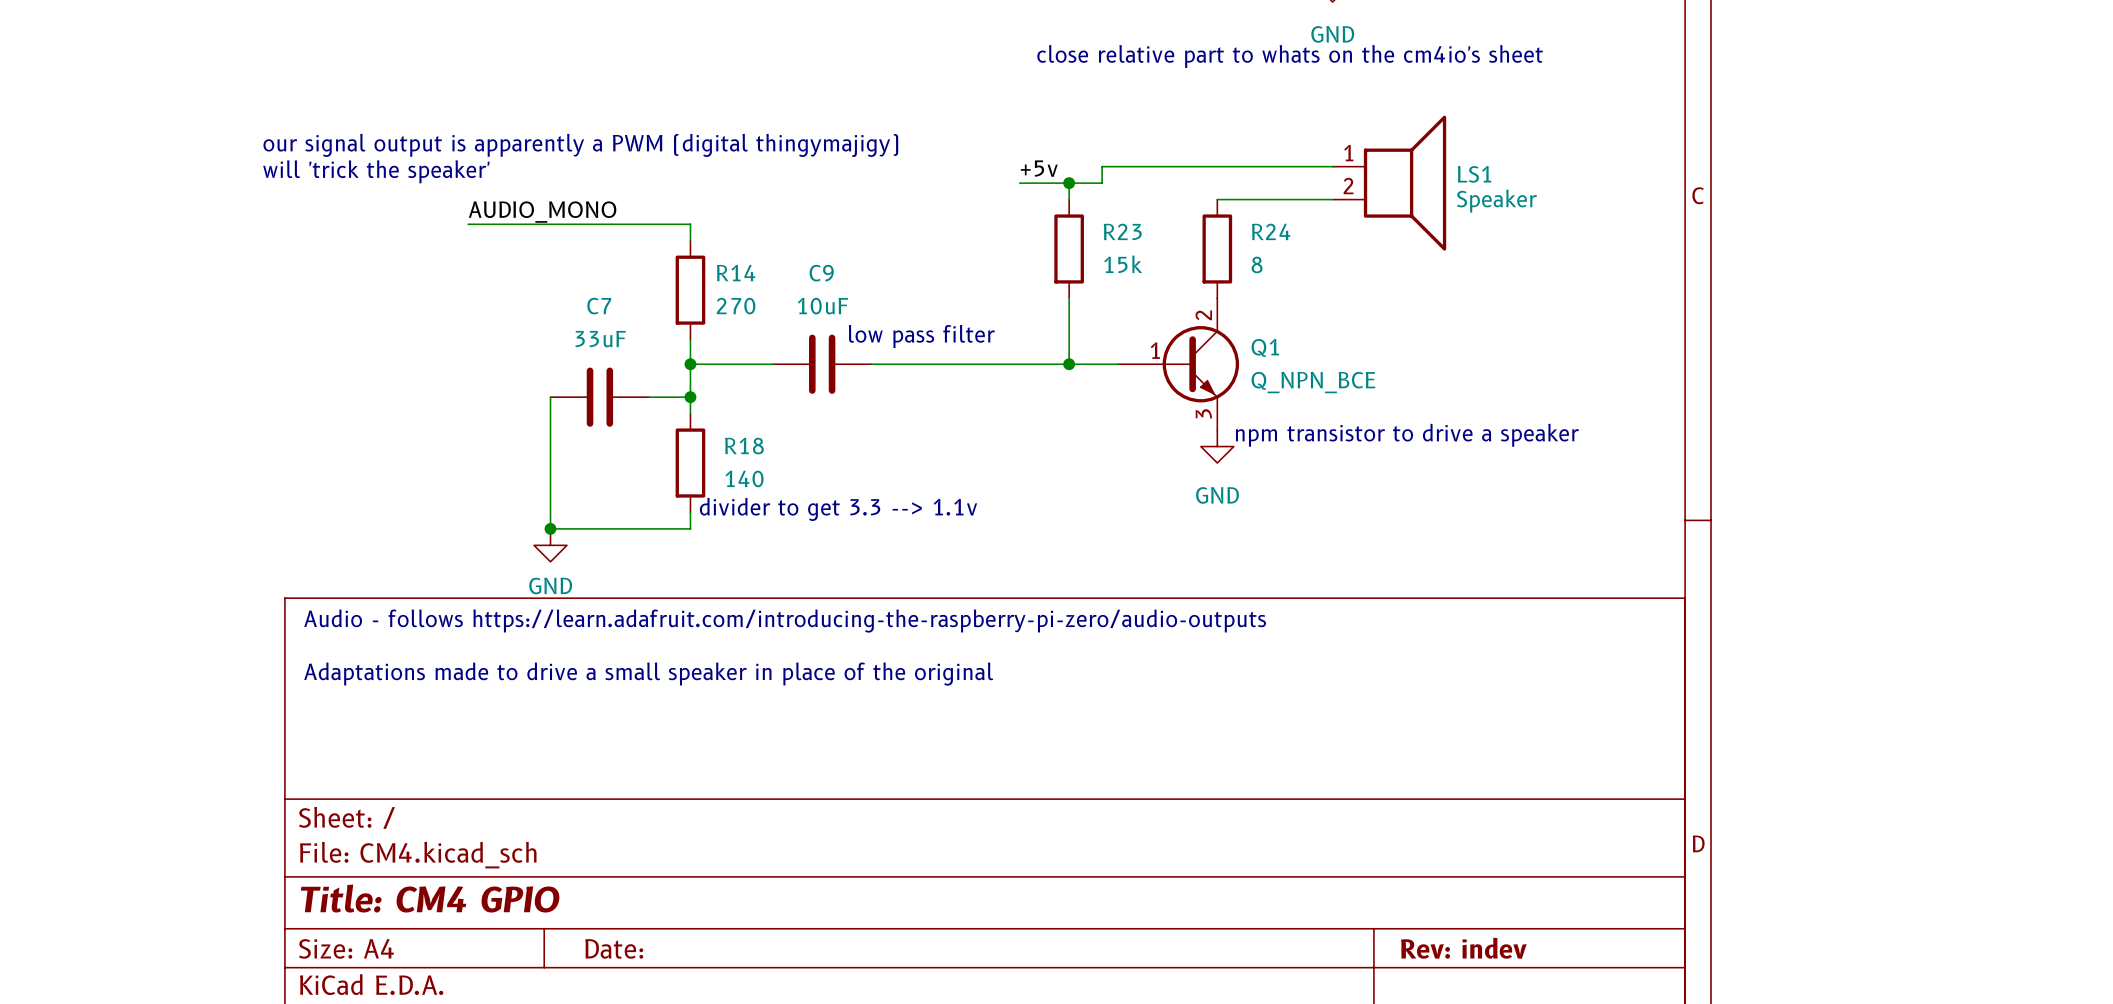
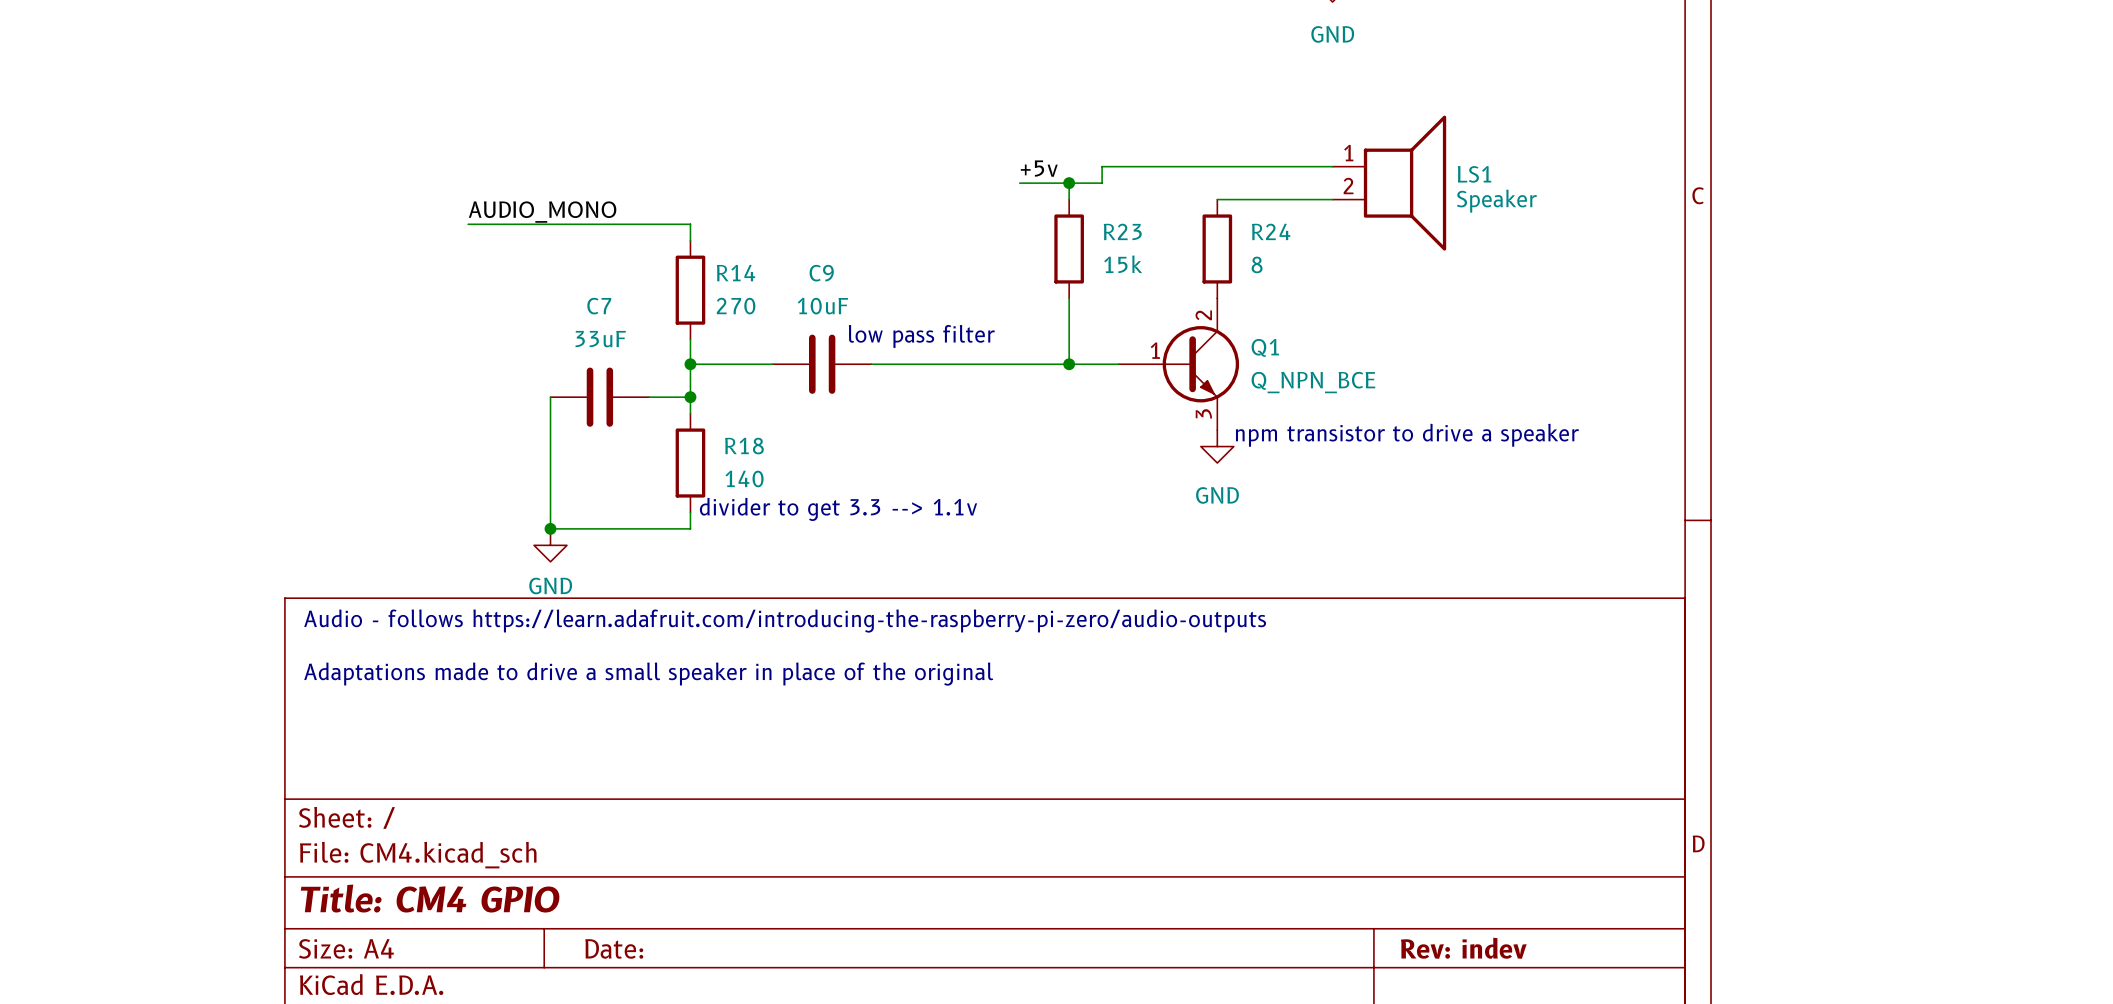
text: close relative part to whats on the cm4io's sheet (1290, 56) -> none
text: our signal output is apparently a PWM (digital thingymajigy) (580, 145) -> none
text: will 'trick the speaker' (376, 171) -> none

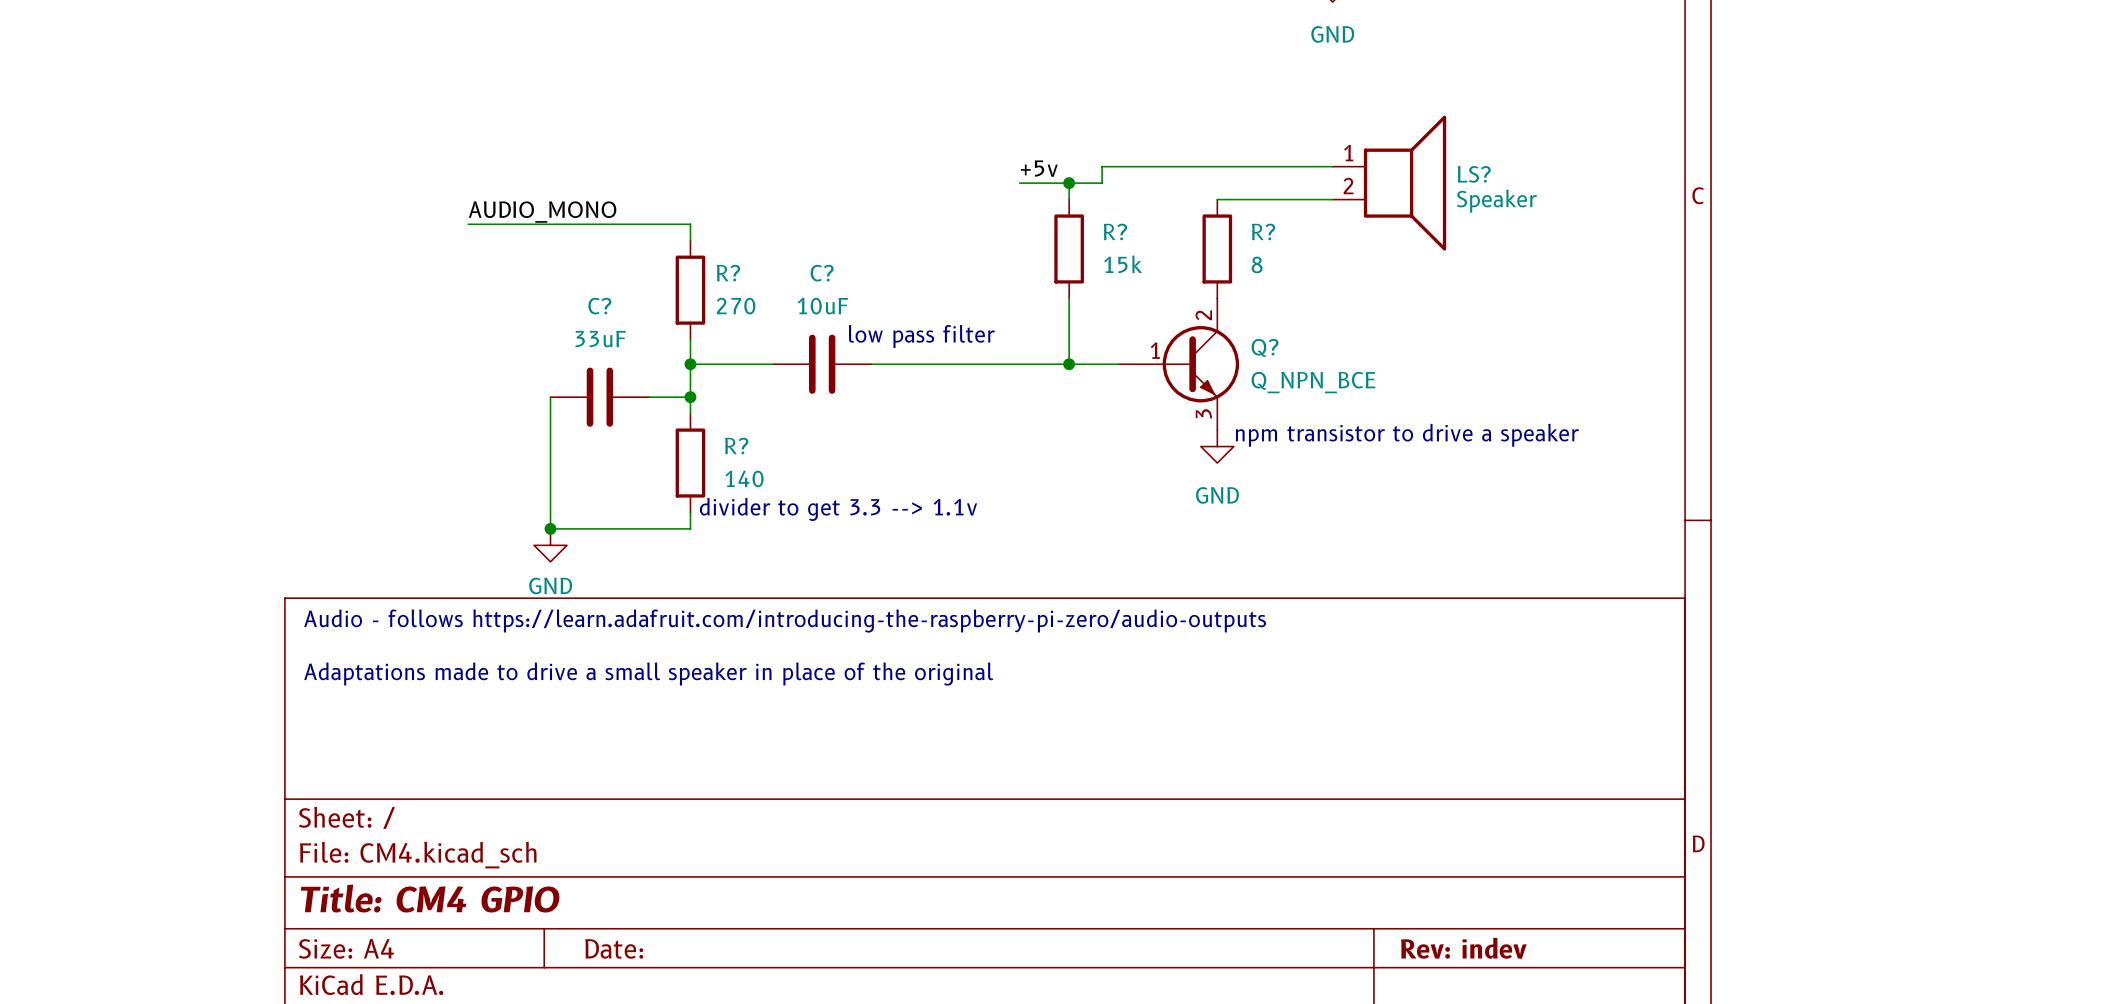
LS1 name: LS1 (1474, 174) -> LS? (1474, 174)
R23 name: R23 (1122, 231) -> R? (1115, 231)
R24 name: R24 (1271, 231) -> R? (1263, 231)
R14 name: R14 (736, 273) -> R? (728, 273)
C9 name: C9 (821, 273) -> C? (822, 273)
C7 name: C7 (599, 306) -> C? (599, 306)
Q1 name: Q1 (1265, 347) -> Q? (1265, 347)
R18 name: R18 (744, 446) -> R? (736, 446)

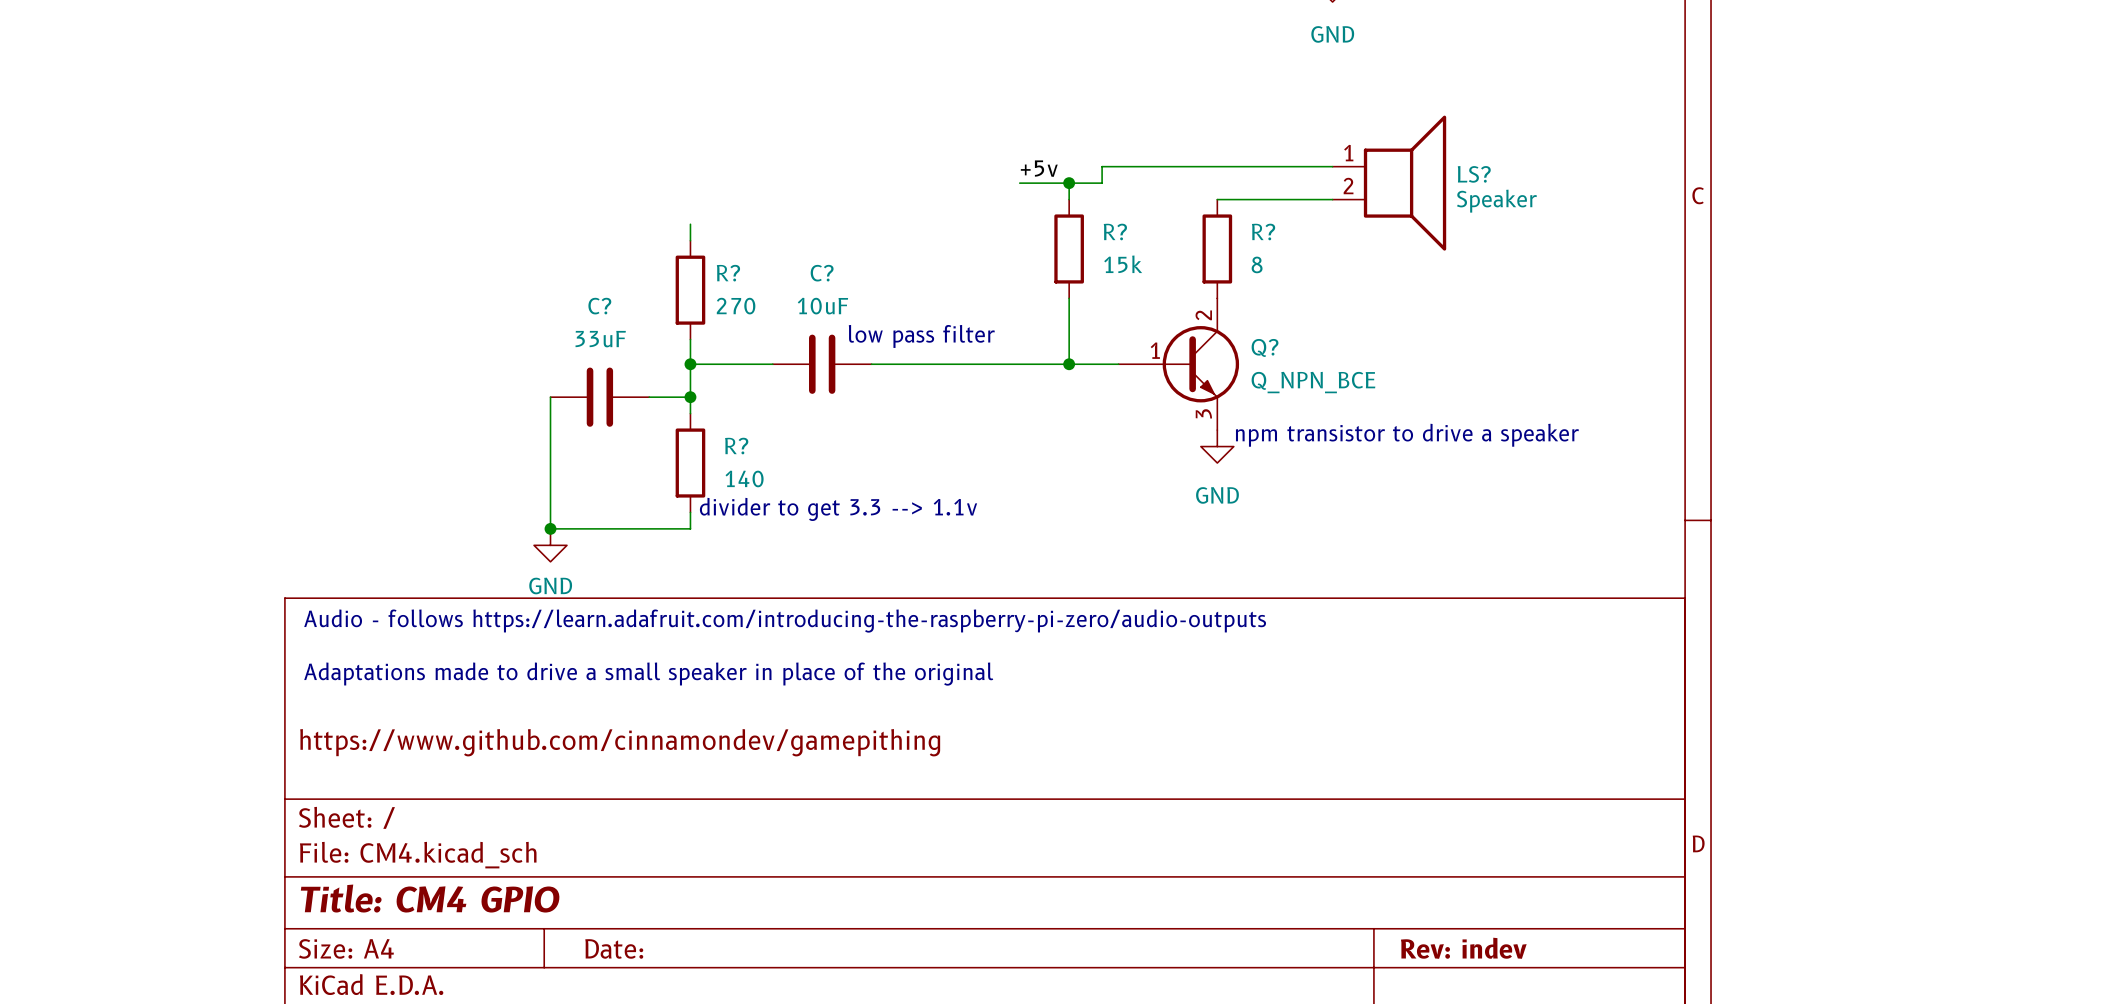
label: AUDIO_MONO (542, 212) -> none
wire: (468, 224) (690, 224) -> none
title block: none -> https://www.github.com/cinnamondev/gamepithing (620, 742)

